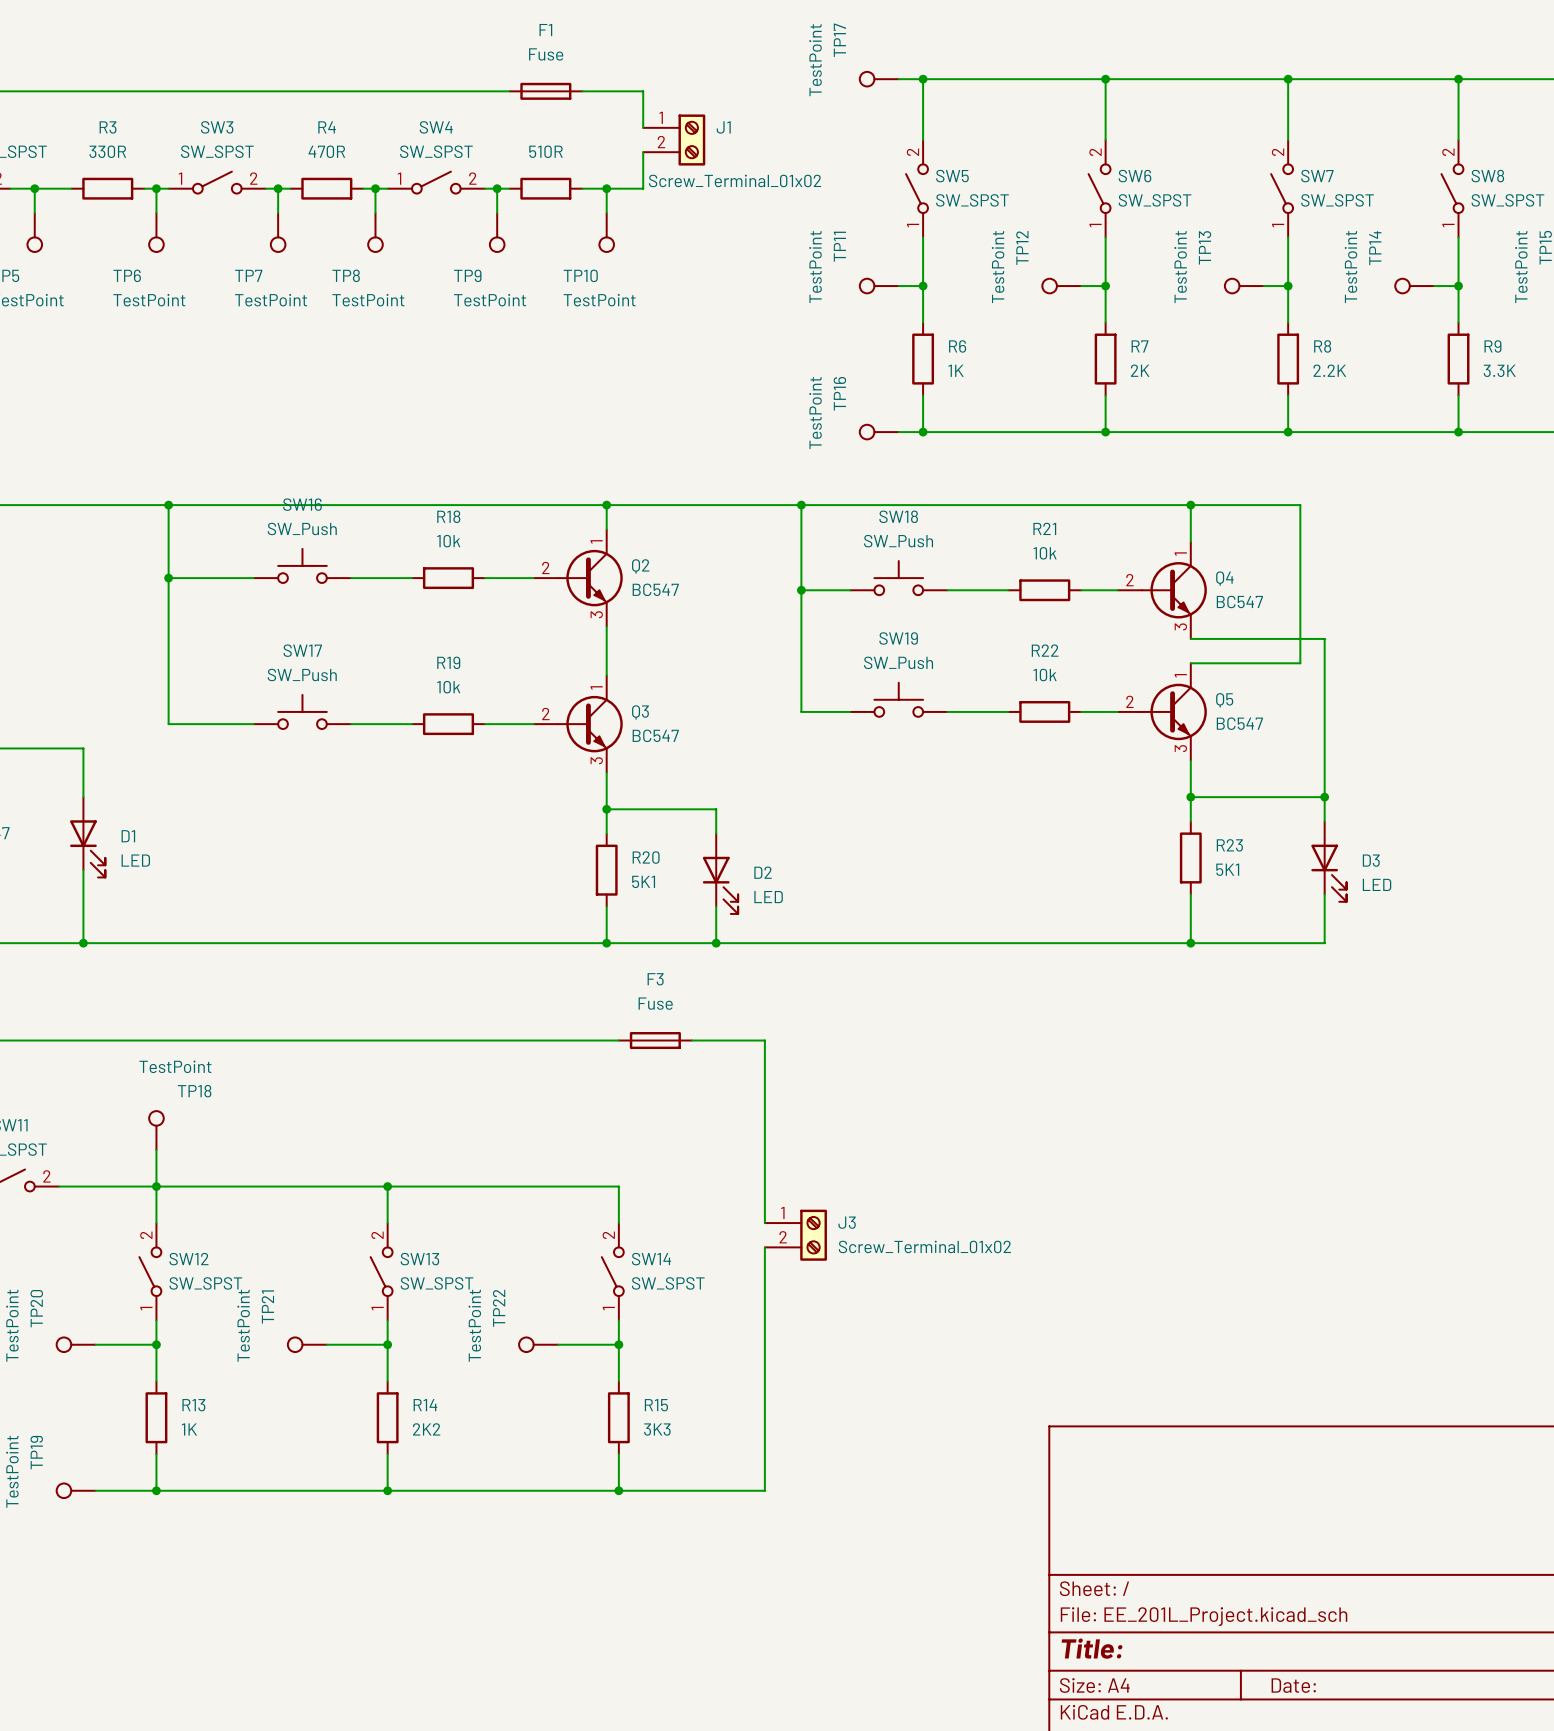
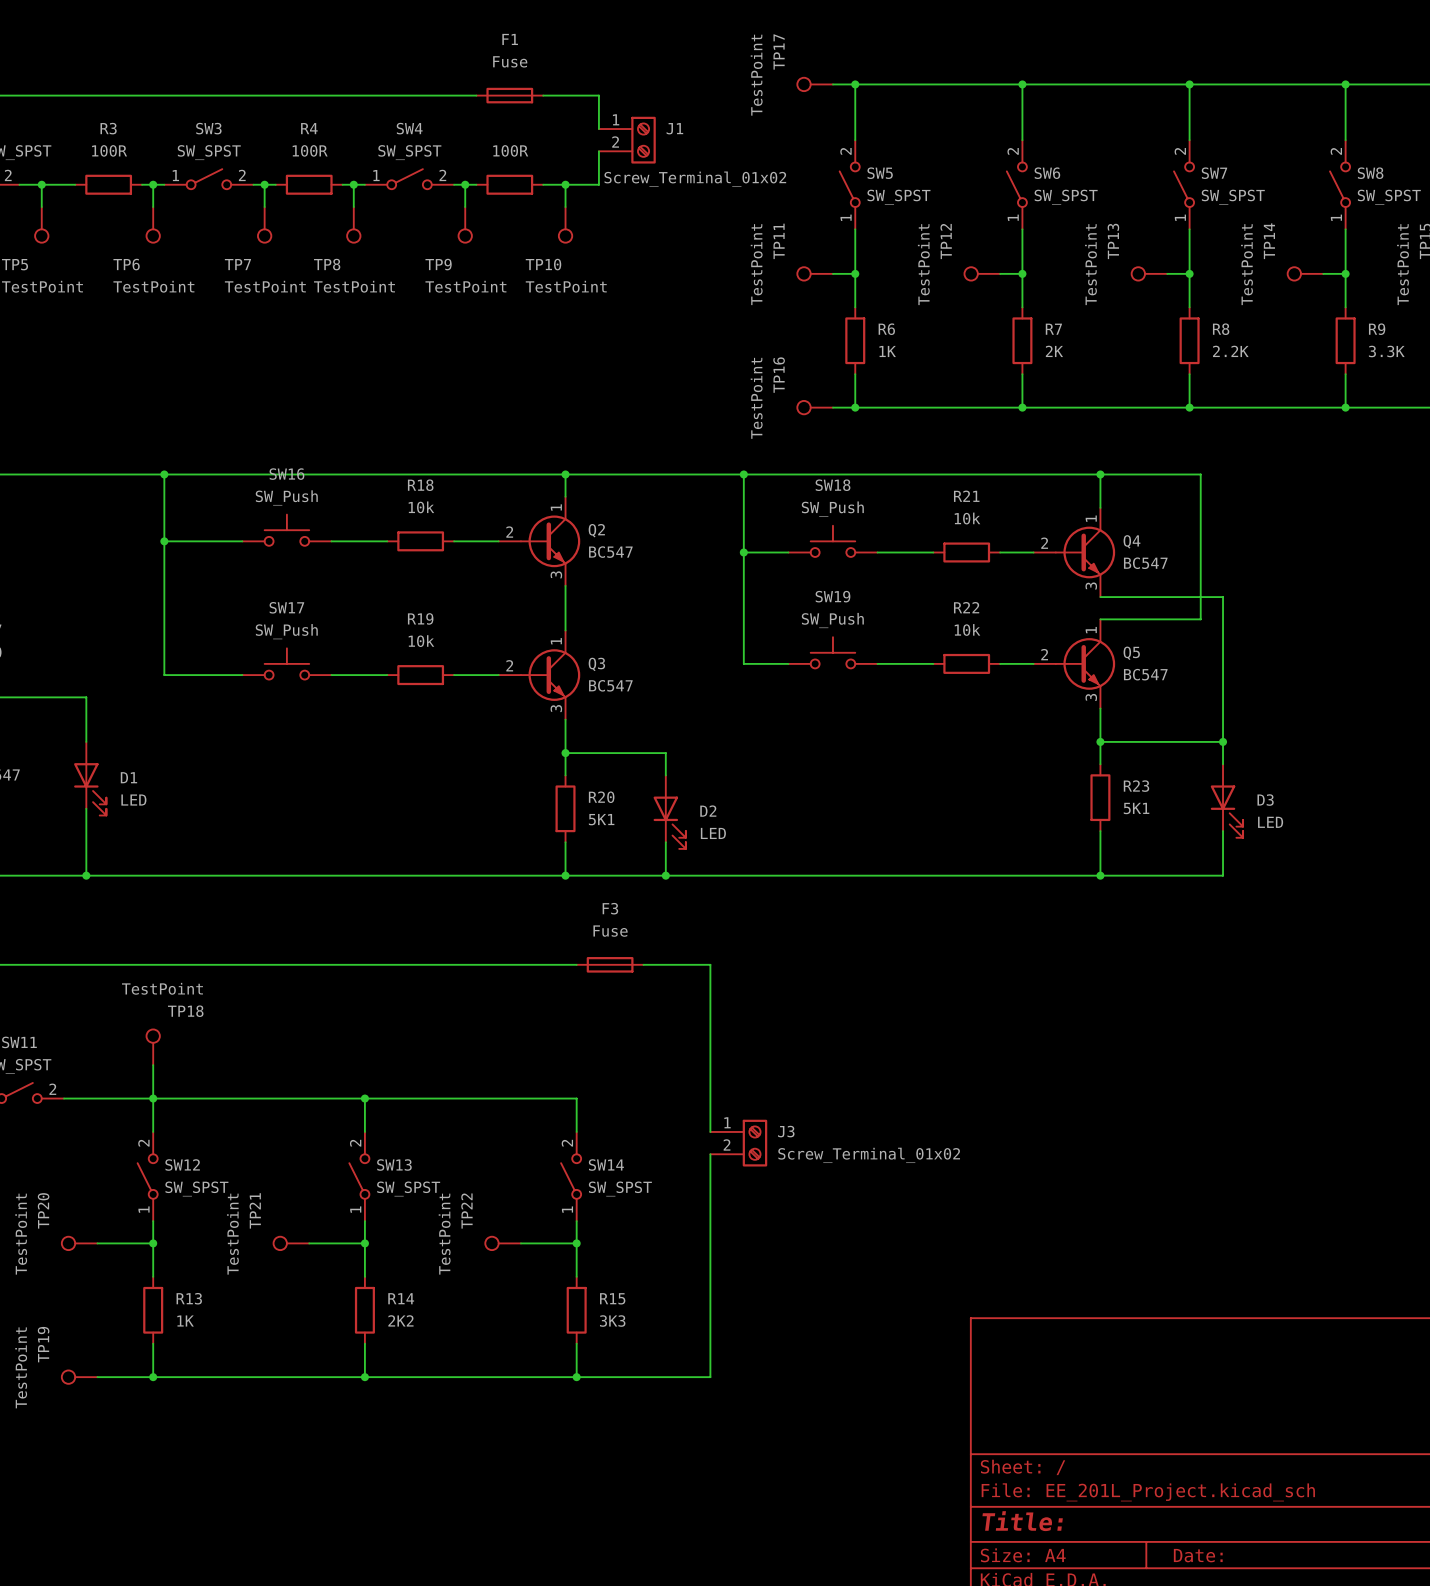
R3 value: 330R (107, 151) -> 100R (109, 150)
R4 value: 470R (326, 151) -> 100R (310, 150)
part value: 510R (546, 151) -> 100R (510, 150)

